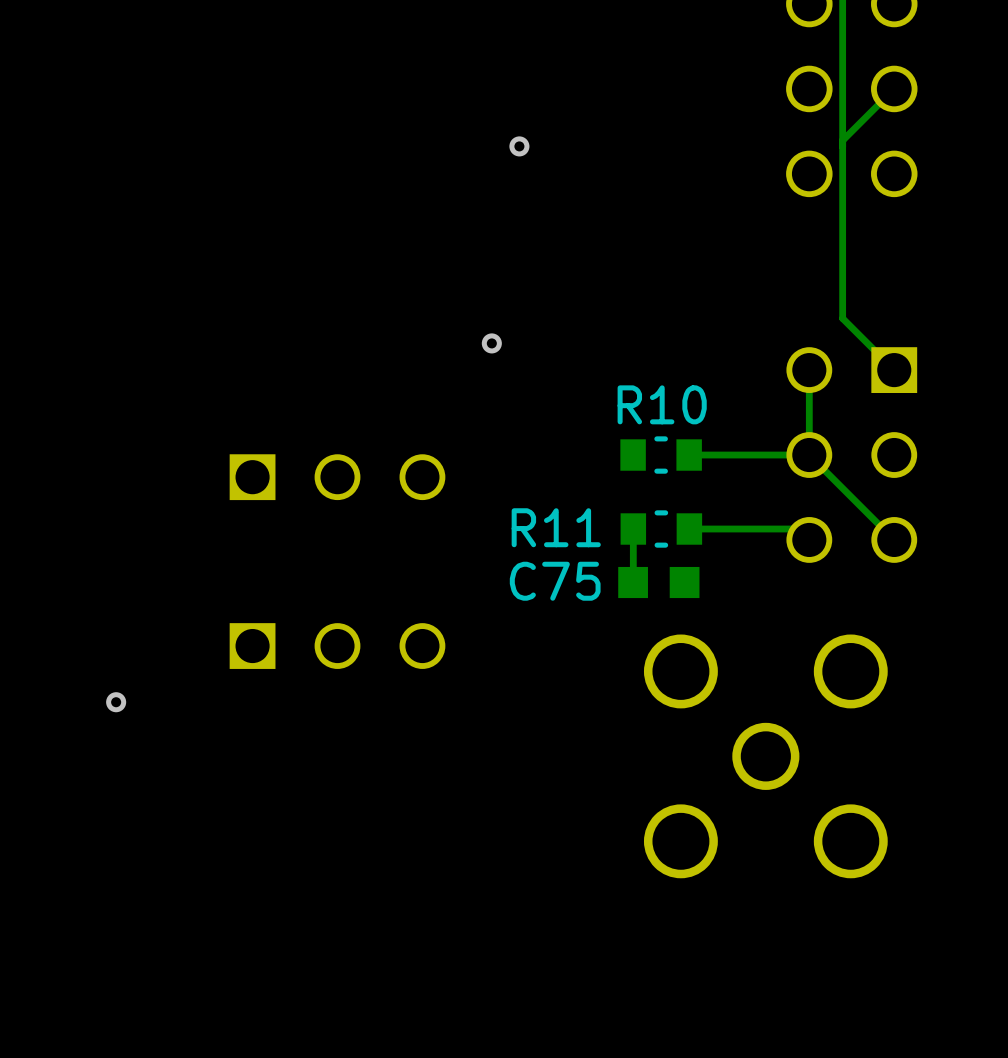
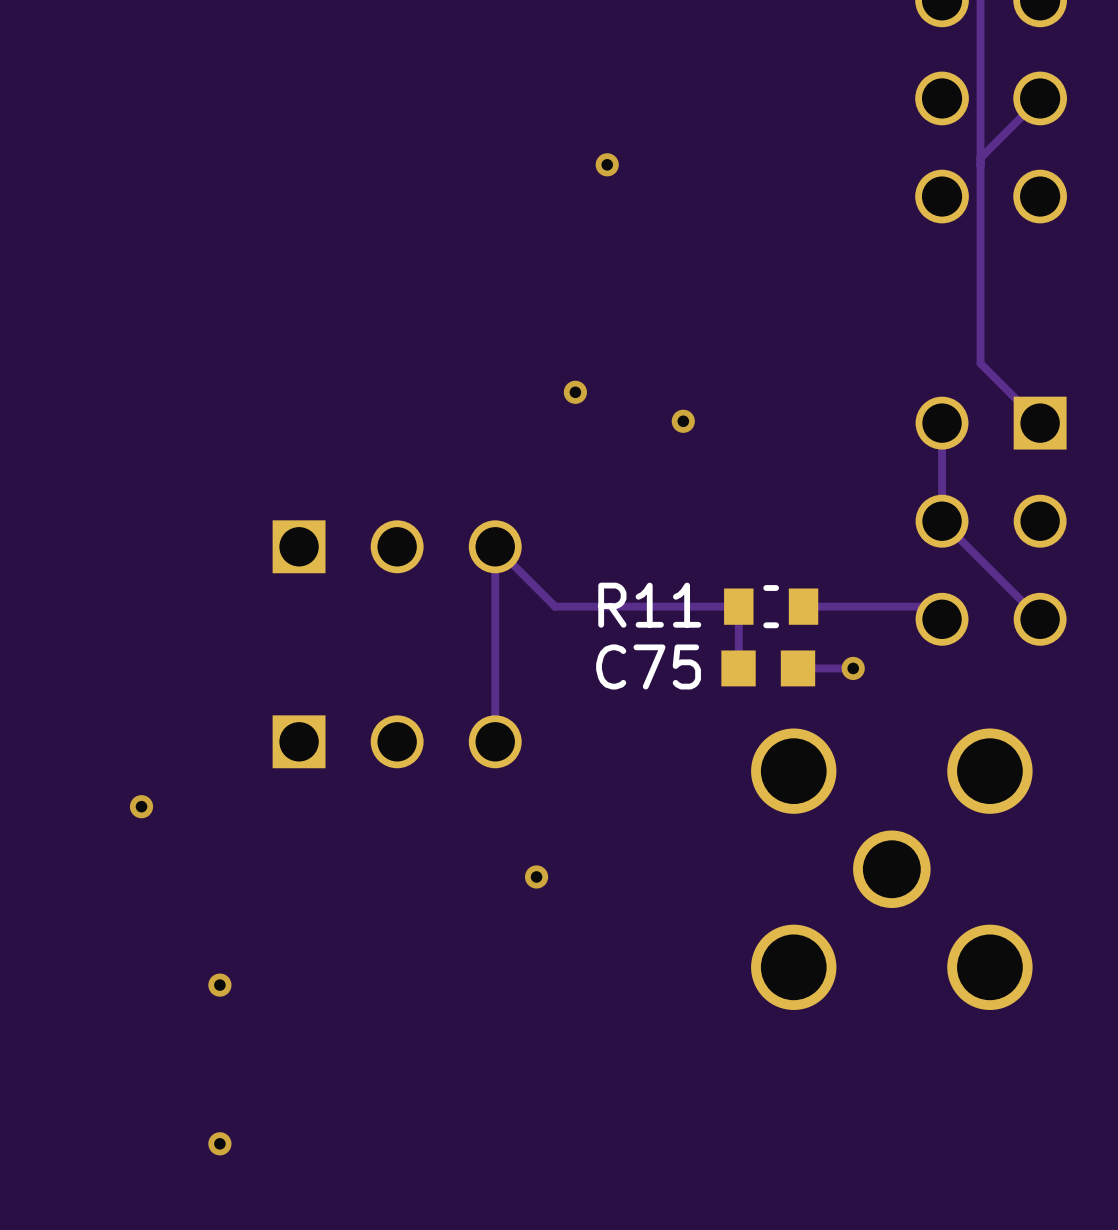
via: none -> (683, 421)
R10: (661, 455) -> none
track: (809, 455) (689, 455) -> none
track: none -> (738, 606) (555, 606) (495, 546) (495, 741)
track: none -> (853, 668) (798, 668)
via: none -> (853, 668)
via: none -> (536, 876)
via: none -> (219, 985)
via: none -> (219, 1143)

